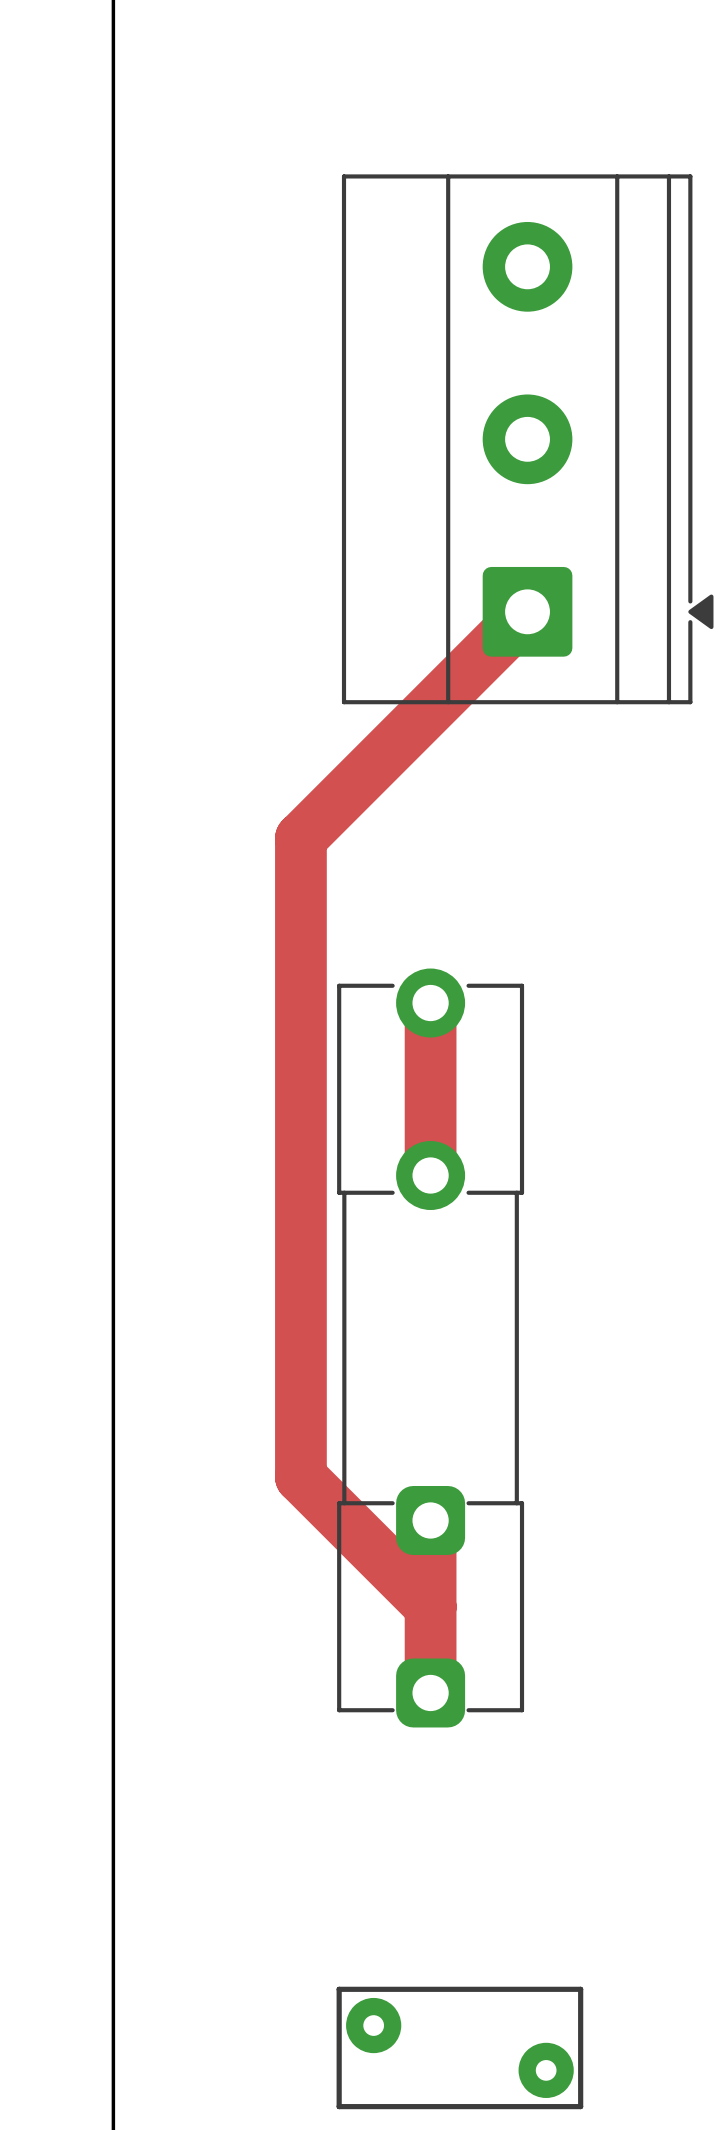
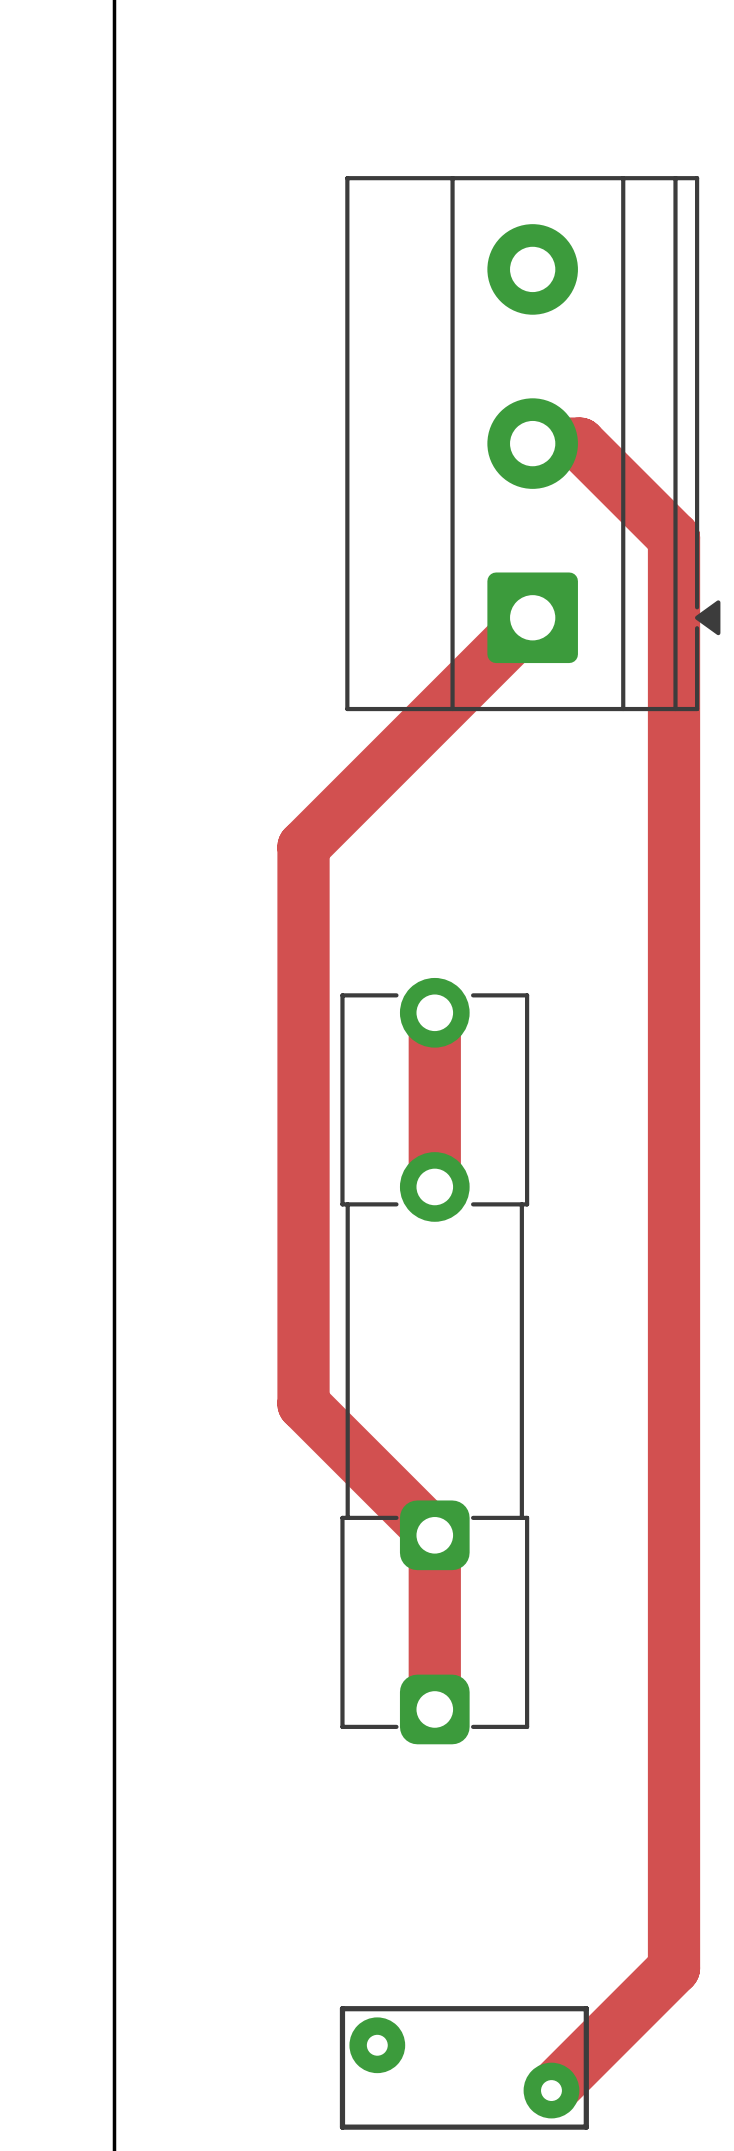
track: none -> (532, 443) (579, 443) (674, 537) (674, 1968) (551, 2090)
track: (300, 838) (300, 1477) (430, 1606) -> (303, 846) (303, 1404) (434, 1535)

